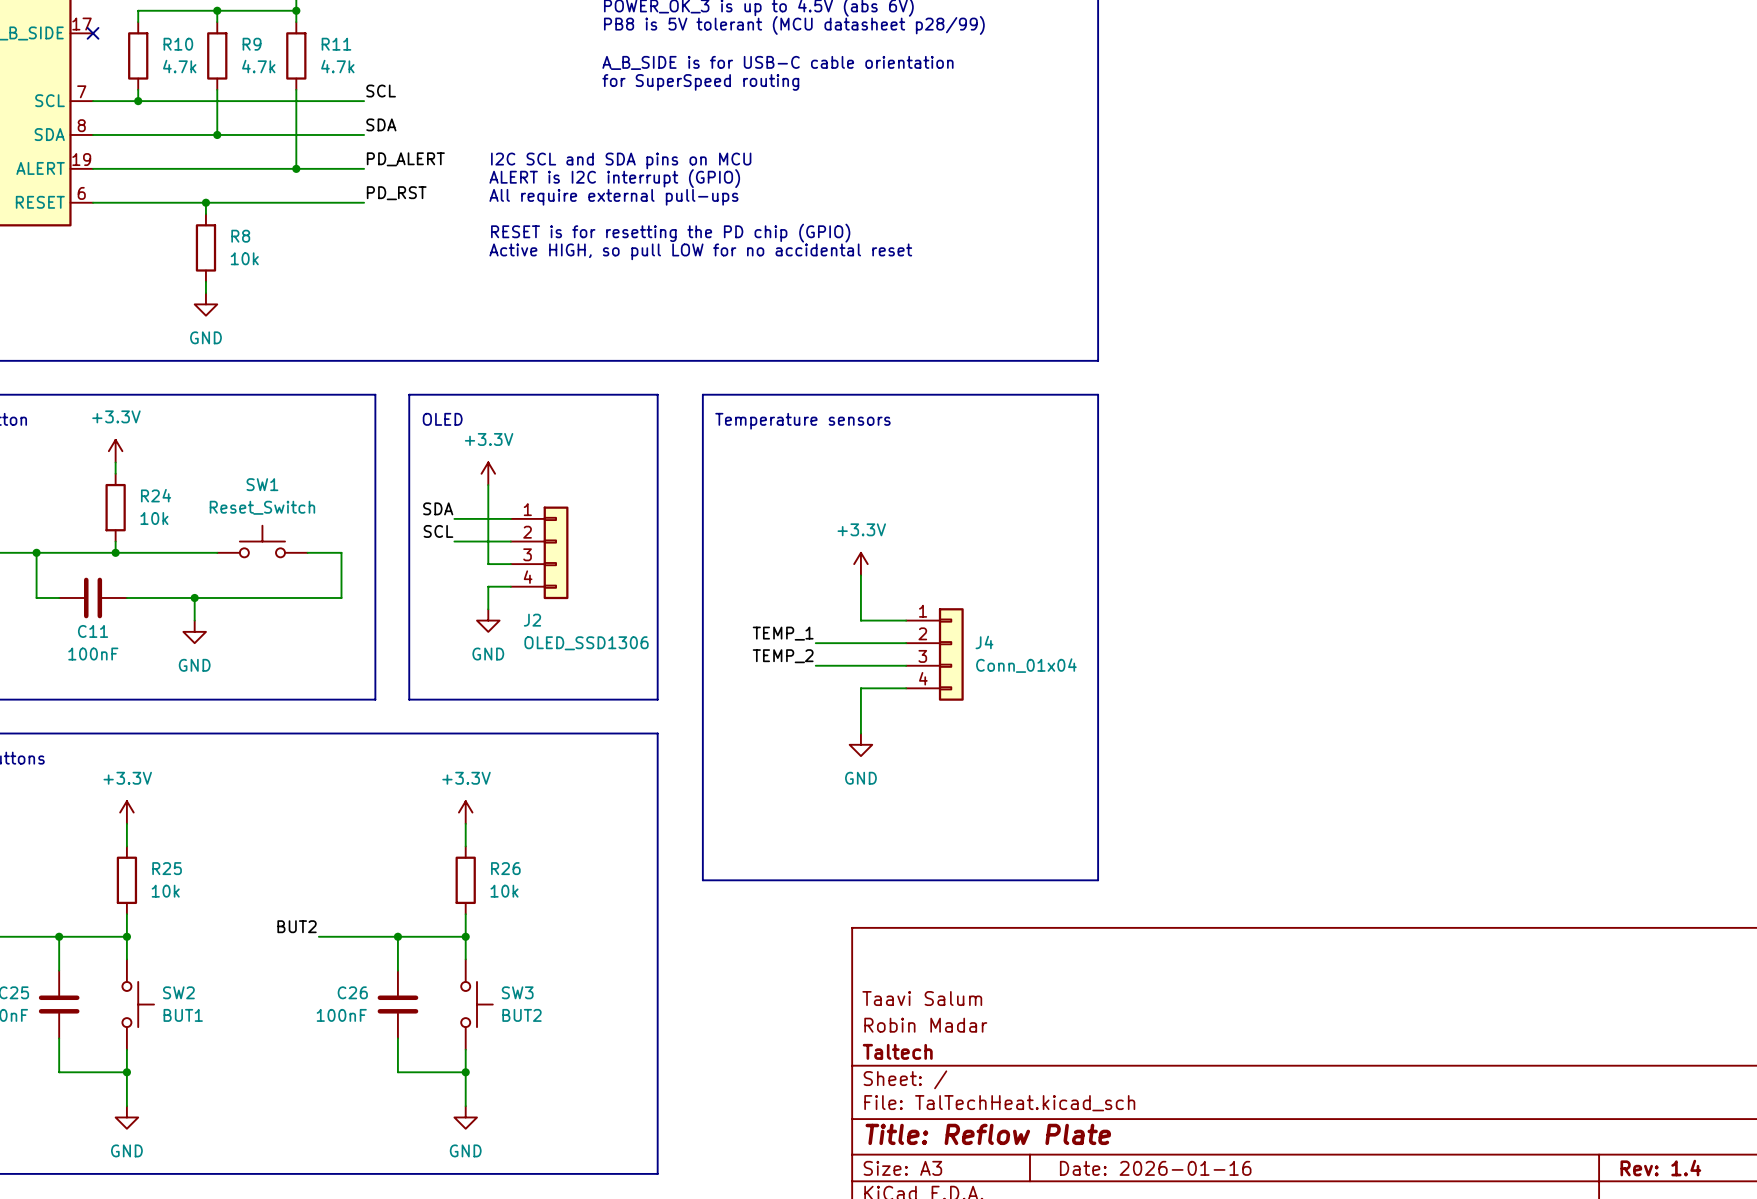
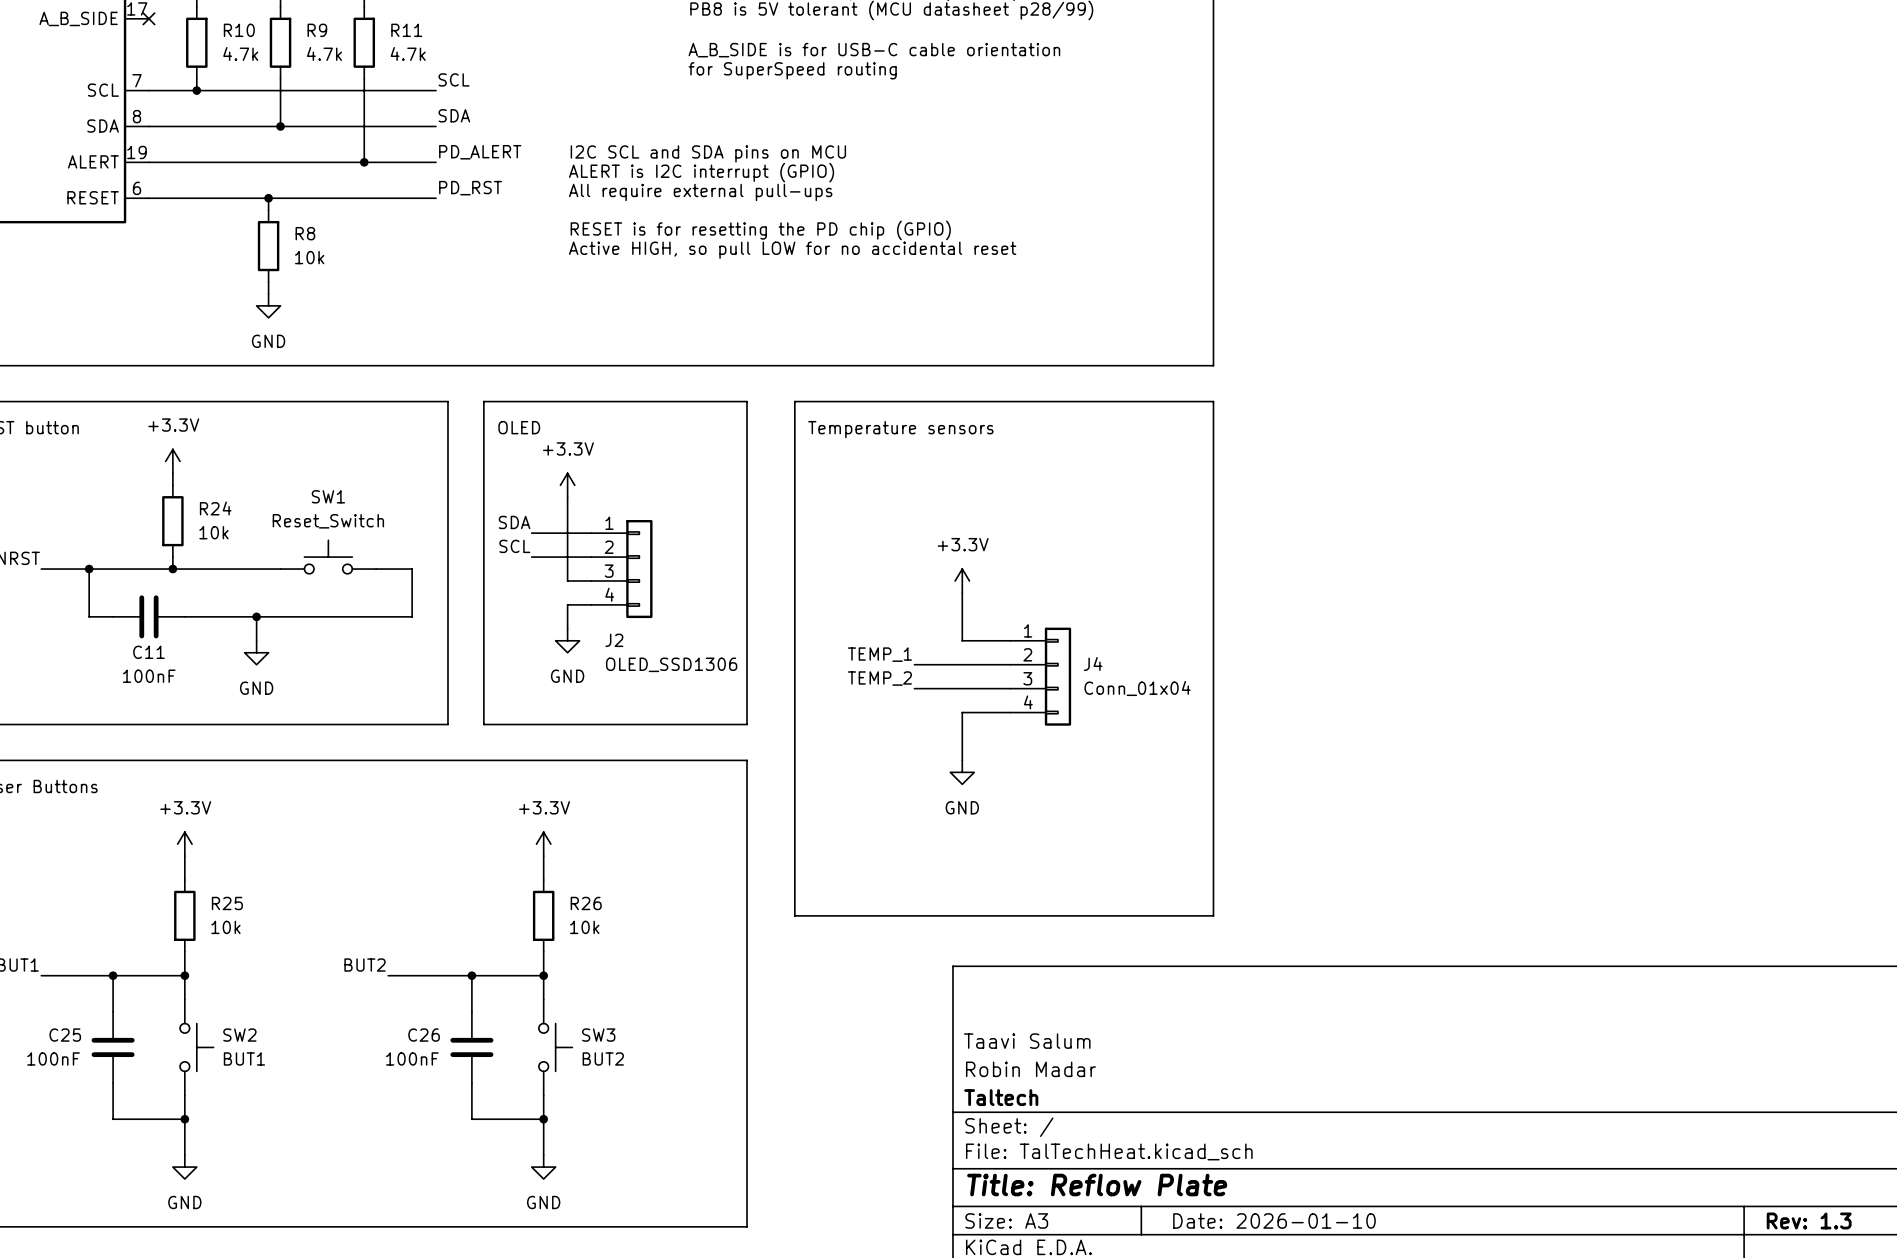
title block: Date: 2026-01-16 (1155, 1168) -> Date: 2026-01-10 (1274, 1220)
title block: Rev: 1.4 (1660, 1168) -> Rev: 1.3 (1809, 1220)

